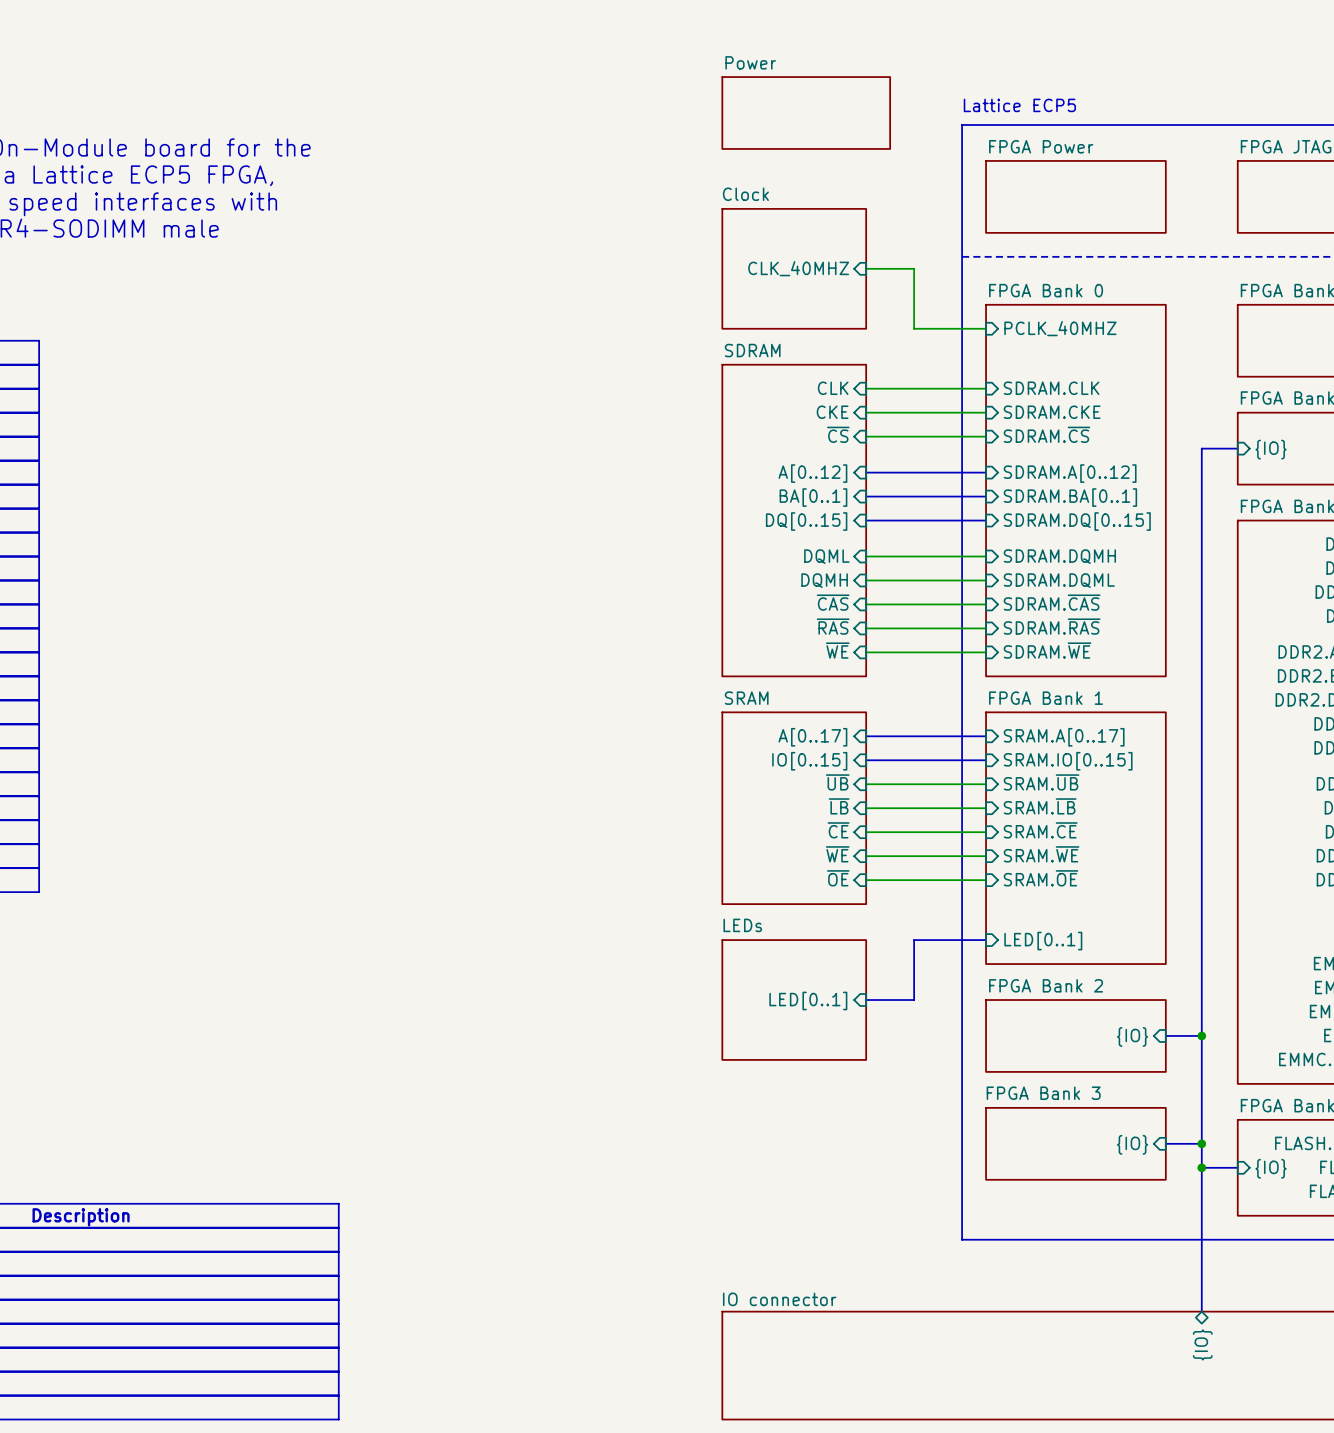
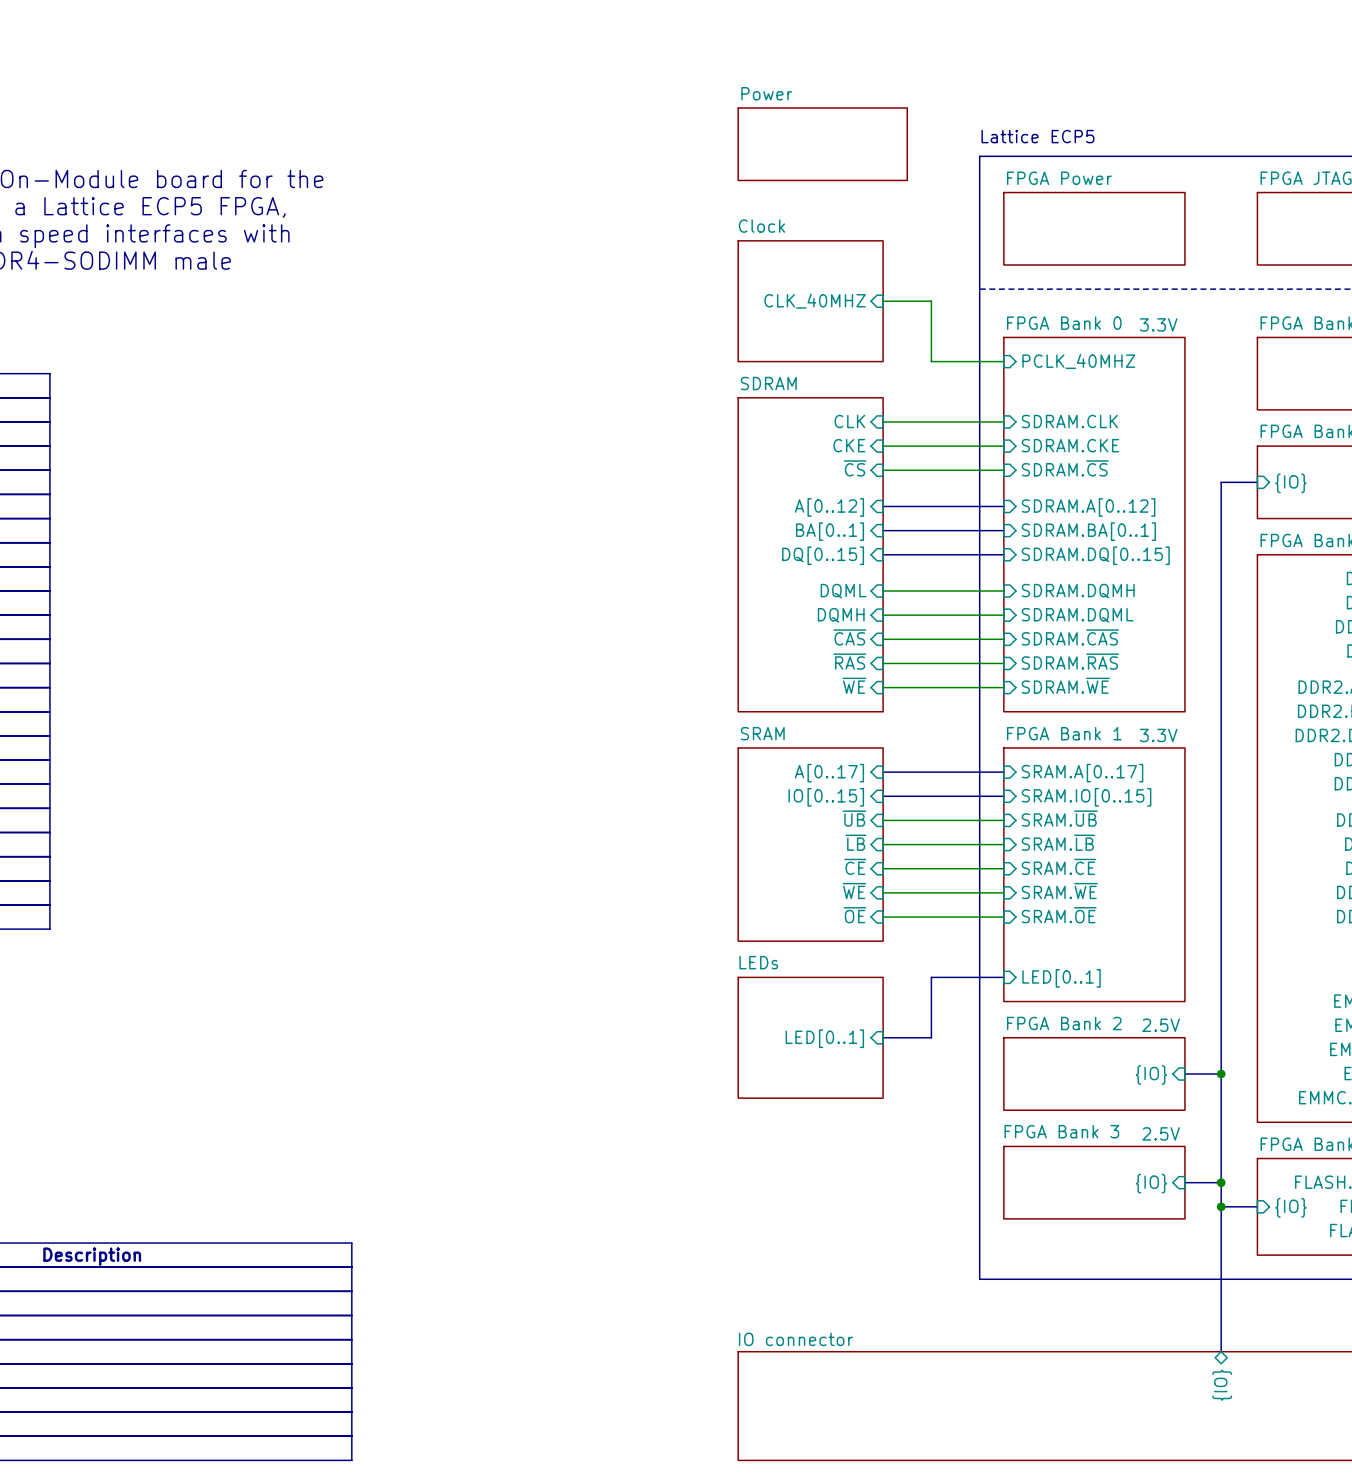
sheet FPGA Bank 0 text: none -> 3.3V (1158, 324)
sheet FPGA Bank 1 text: none -> 3.3V (1158, 735)
sheet FPGA Bank 2 text: none -> 2.5V (1161, 1025)
sheet FPGA Bank 3 text: none -> 2.5V (1161, 1133)

